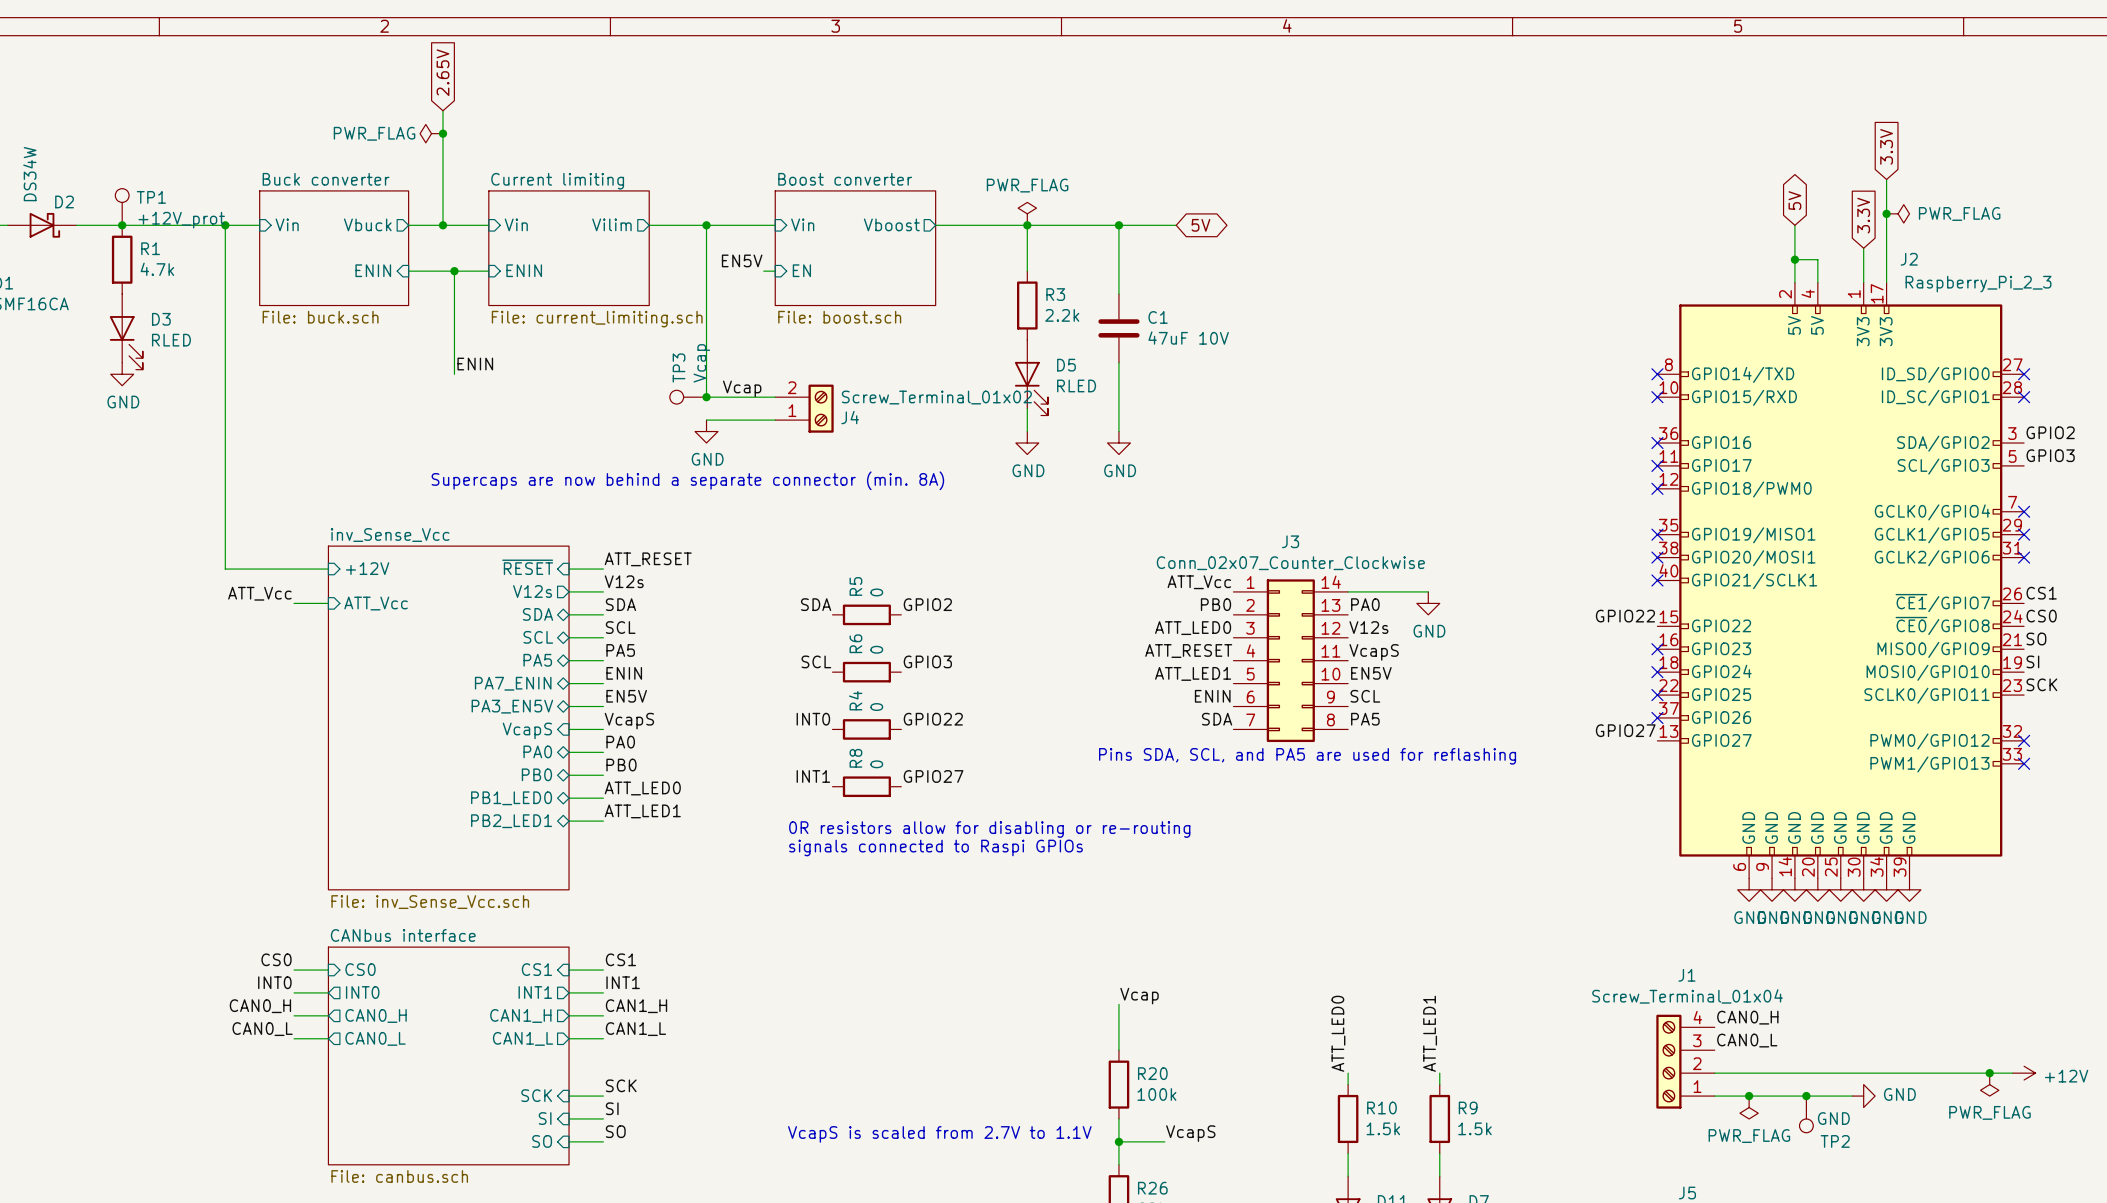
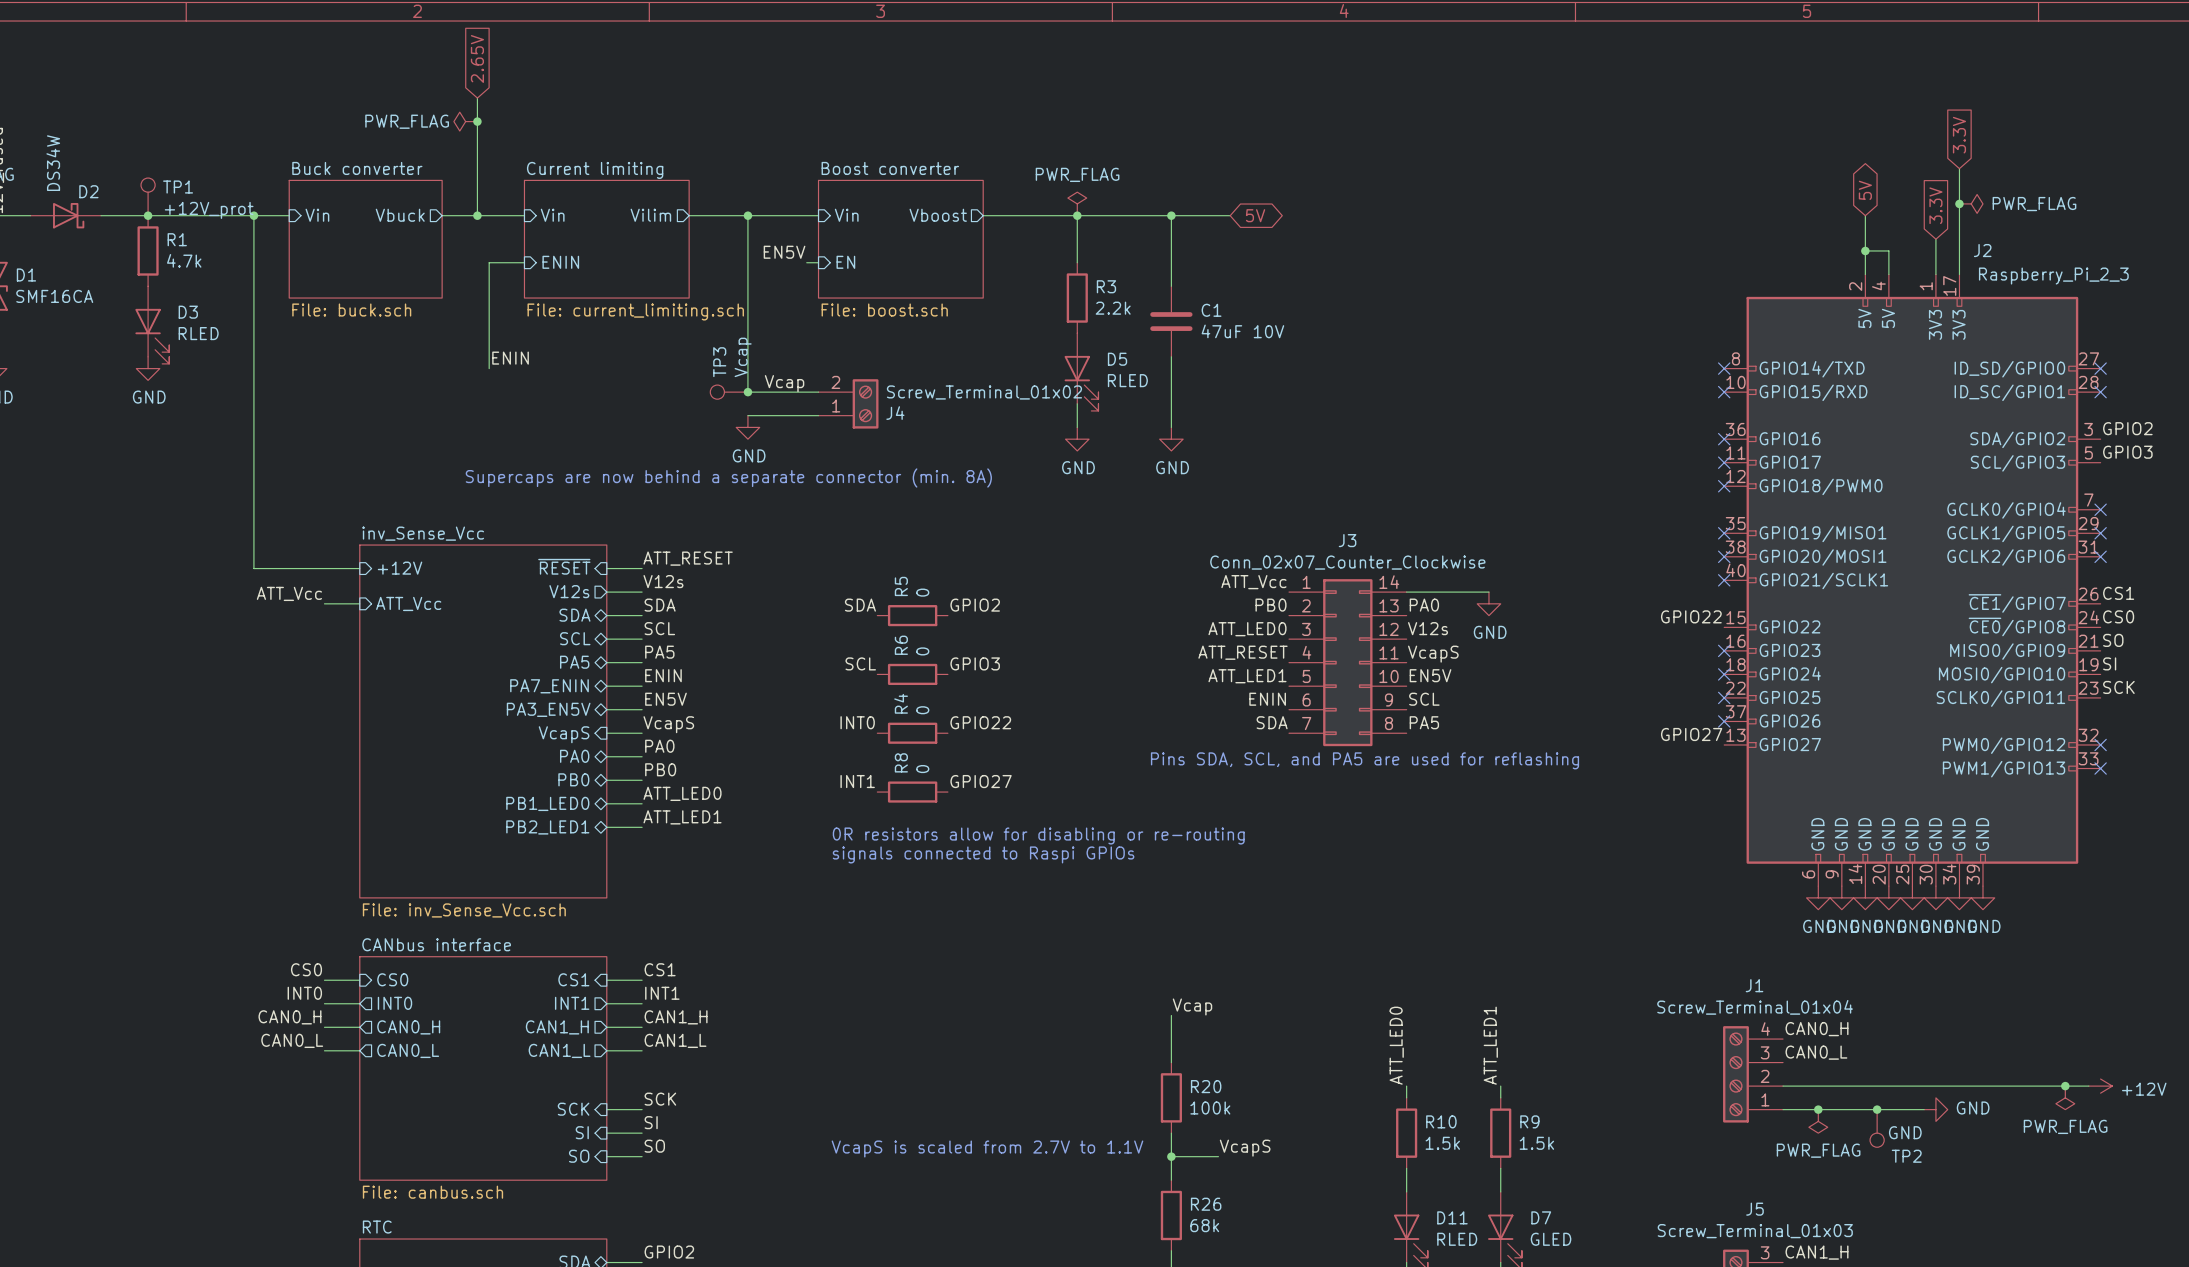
sheet pin: ENIN (373, 270) -> none
wire: (408, 271) (454, 271) -> none
junction: (454, 271) -> none

